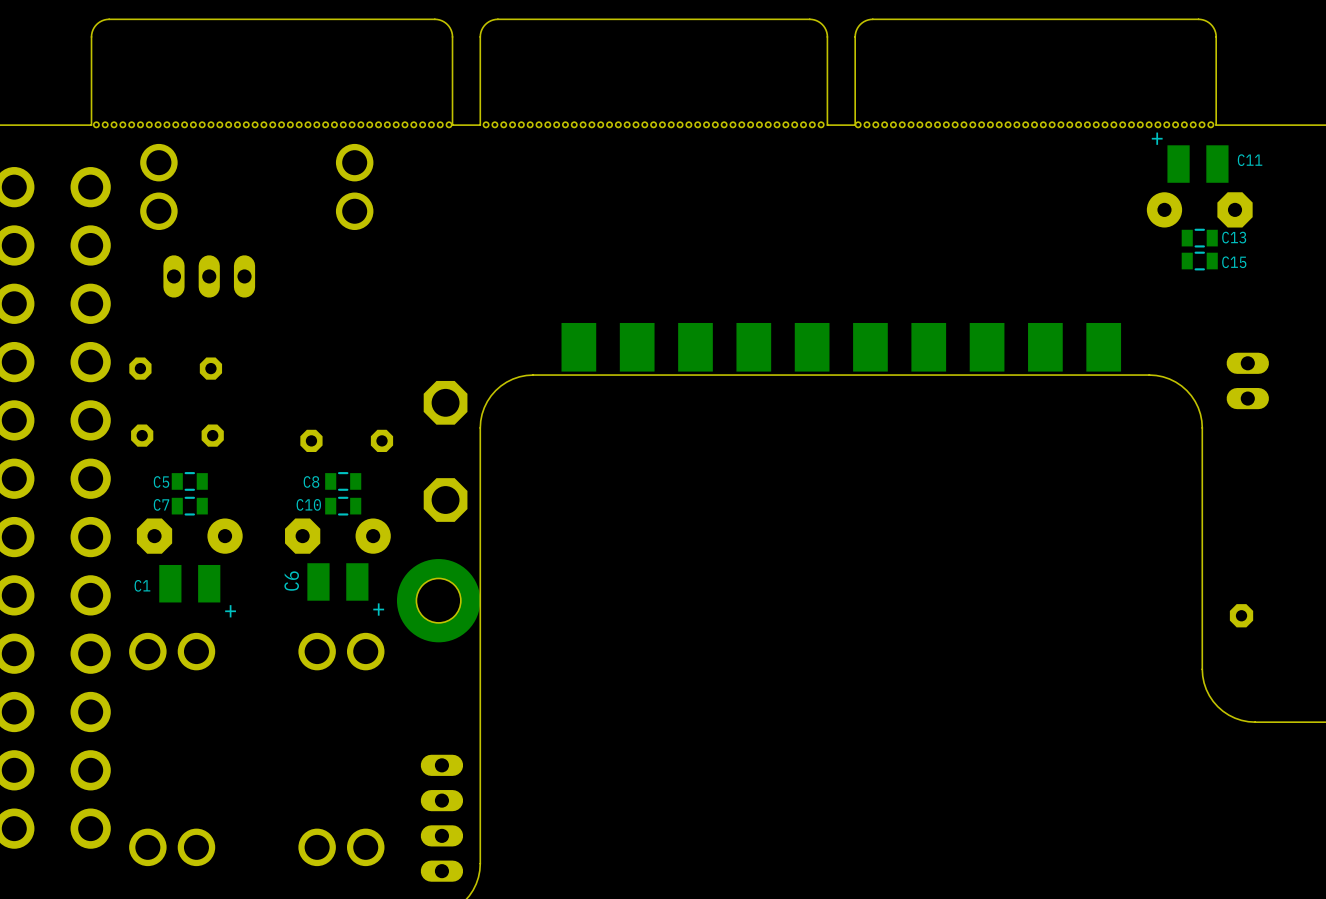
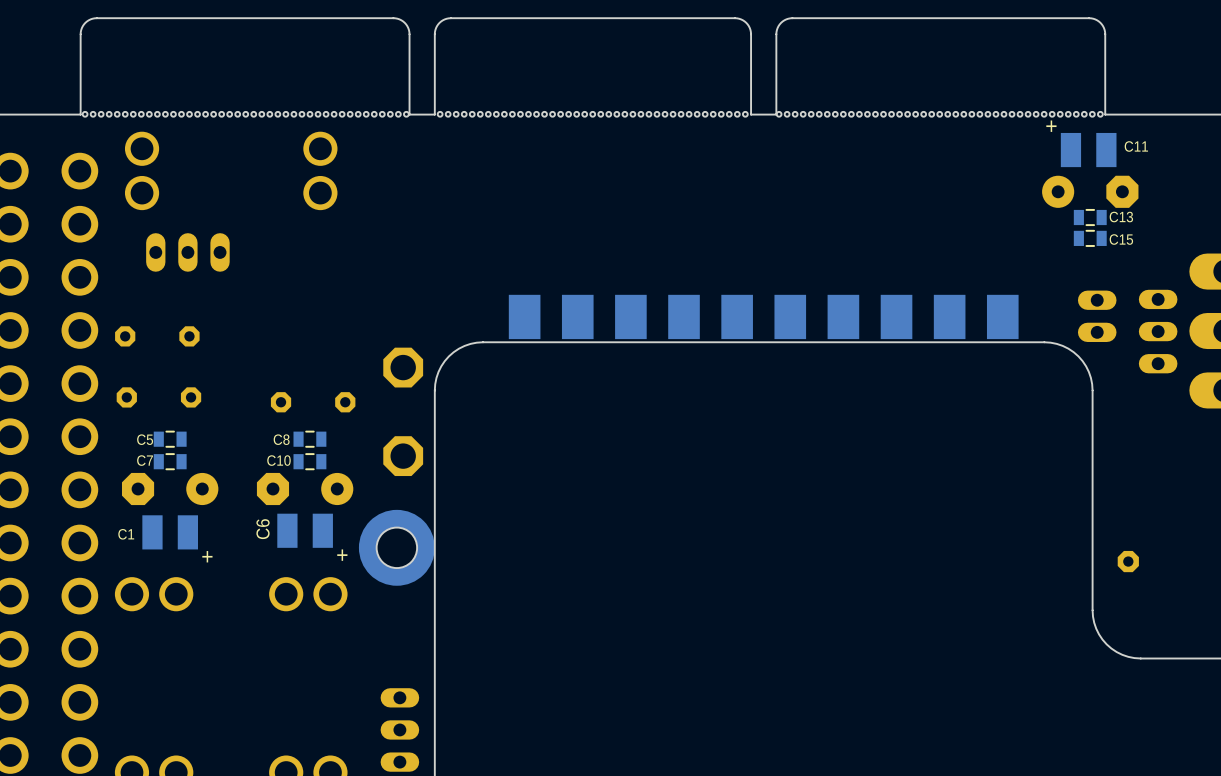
part: none -> (1158, 331)
part position: (1247, 380) -> (1097, 316)

